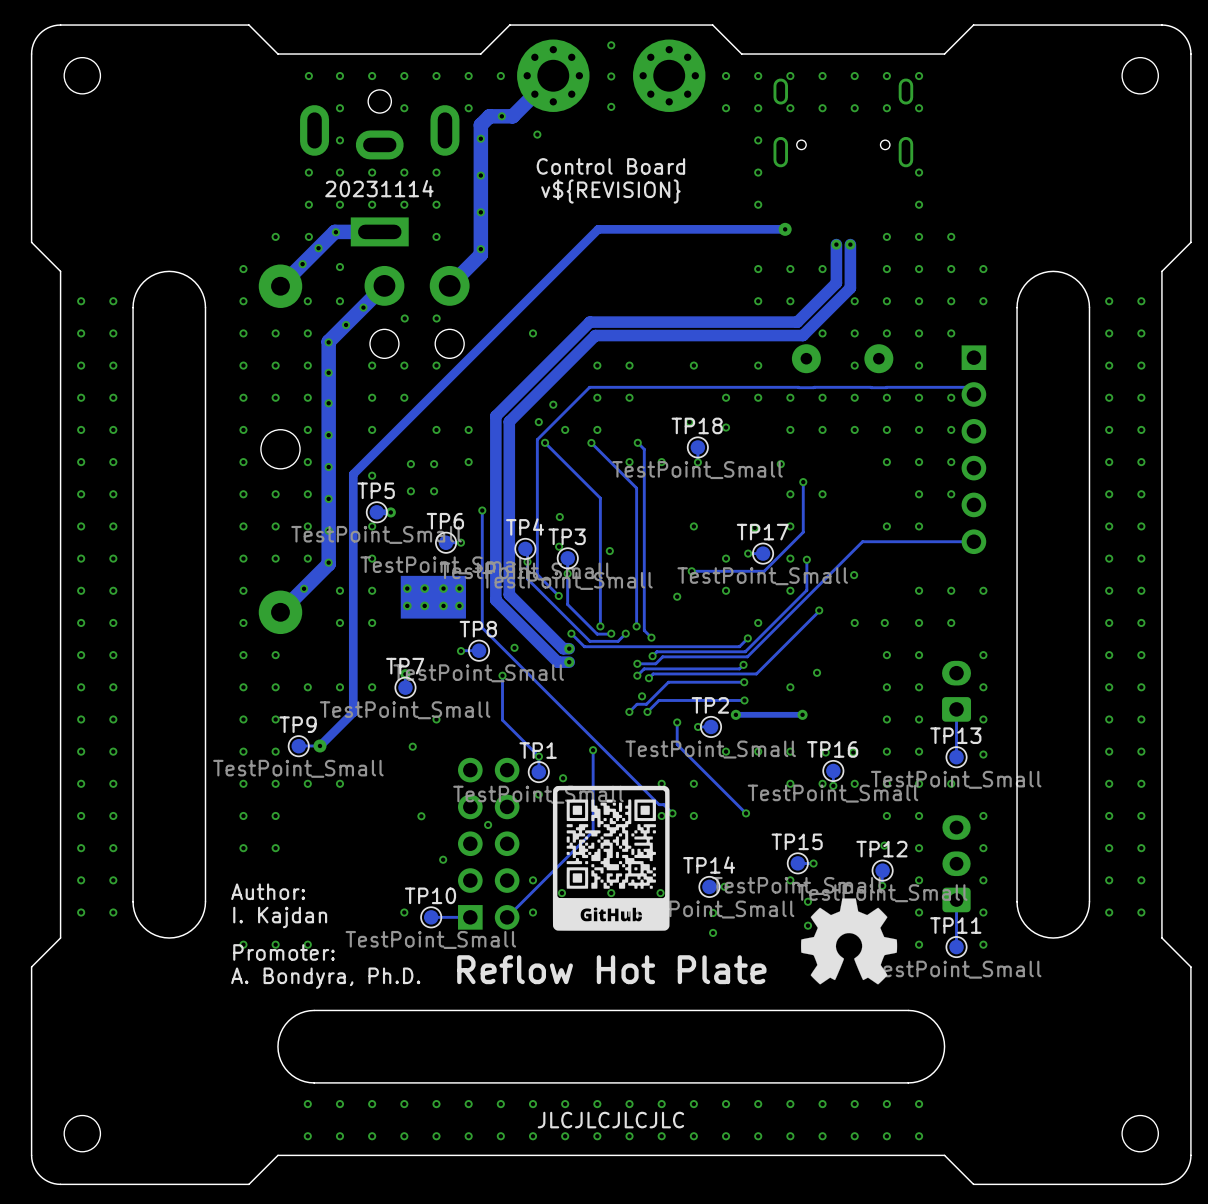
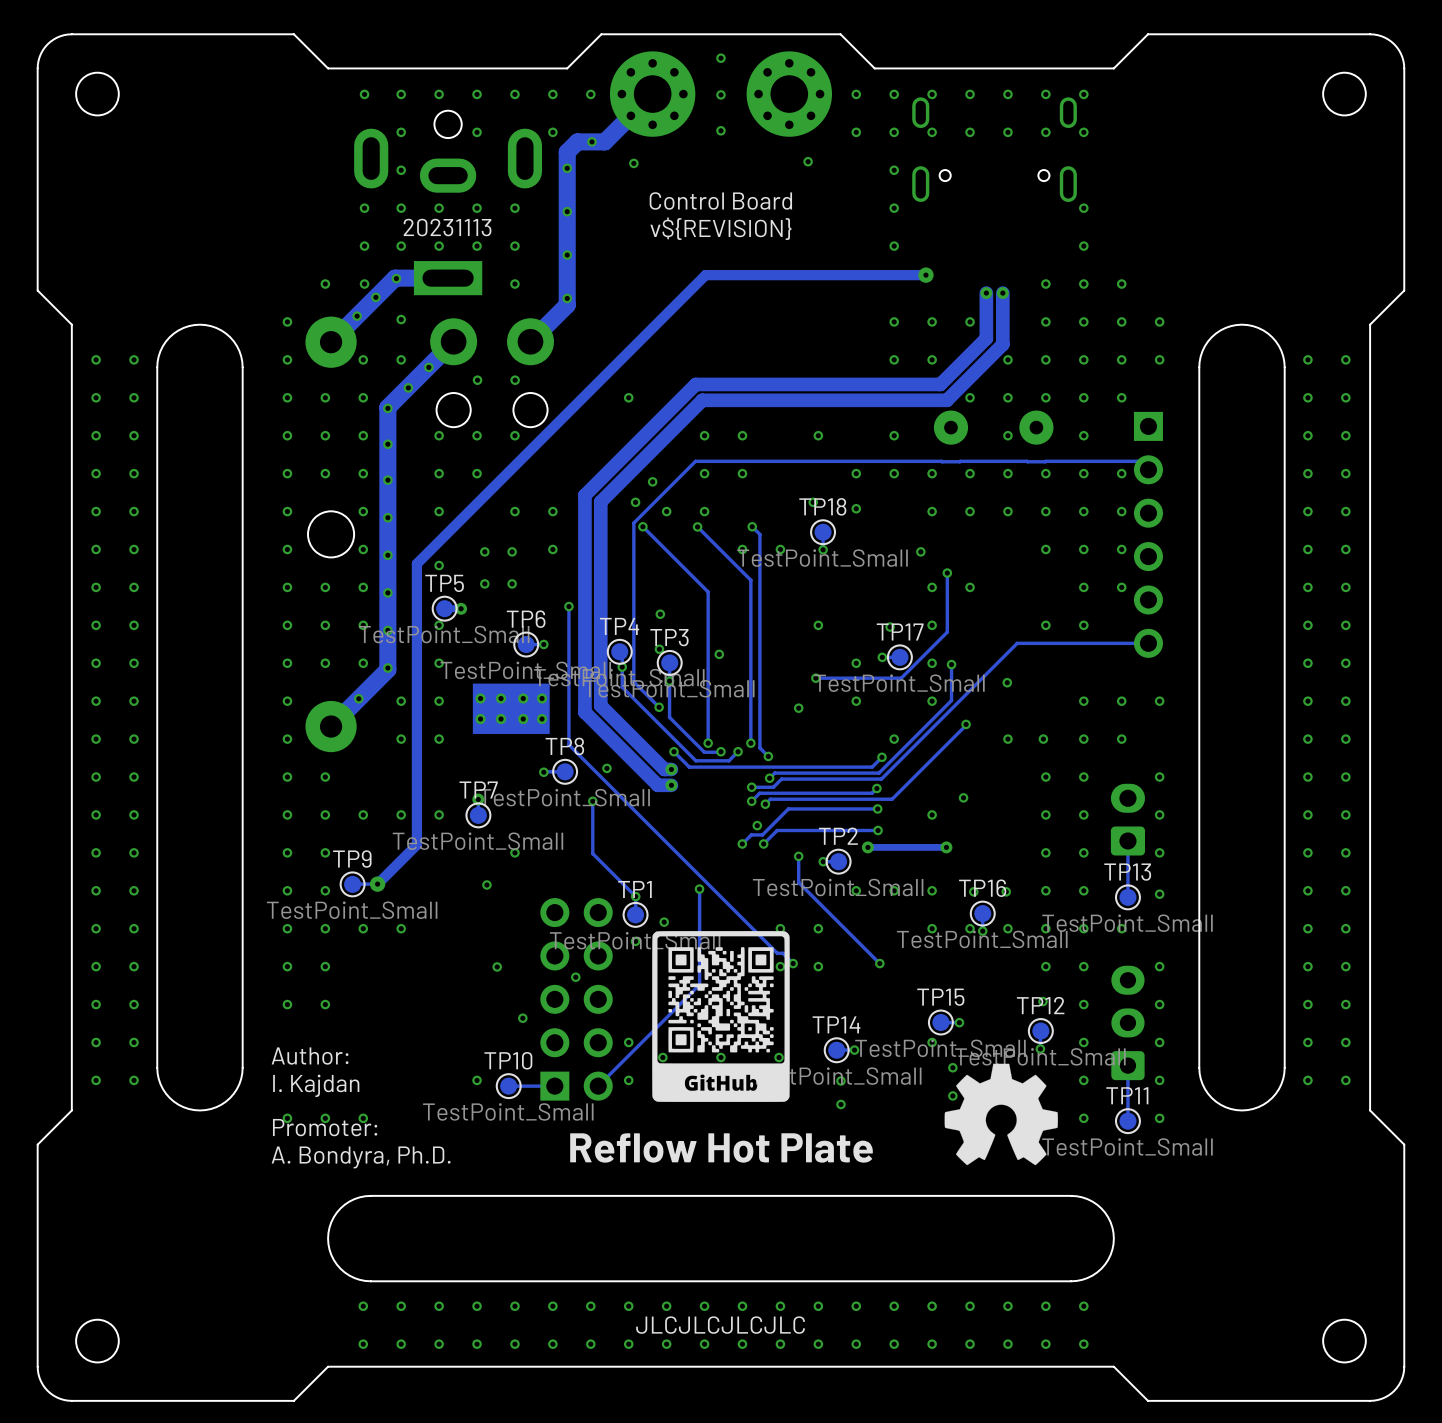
via: none -> (808, 161)
text: 20231114 (379, 188) -> 20231113 (447, 227)

